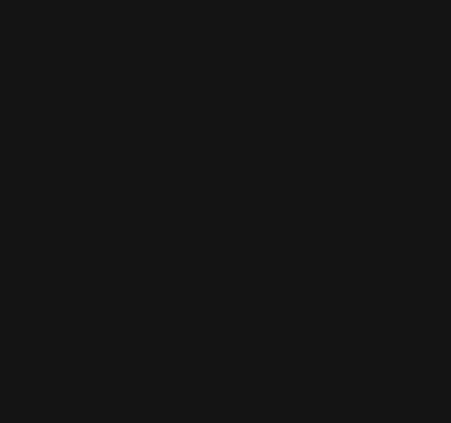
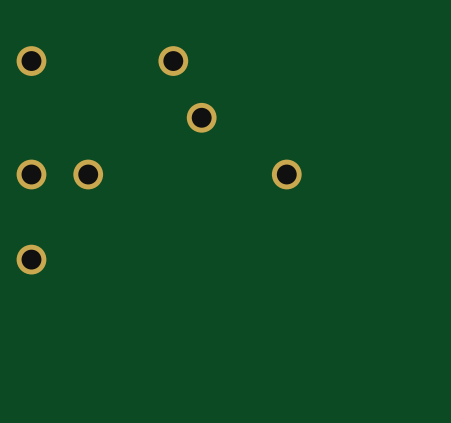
via: none -> (31, 61)
via: none -> (173, 61)
via: none -> (201, 117)
via: none -> (31, 174)
via: none -> (88, 174)
via: none -> (286, 174)
via: none -> (31, 259)

